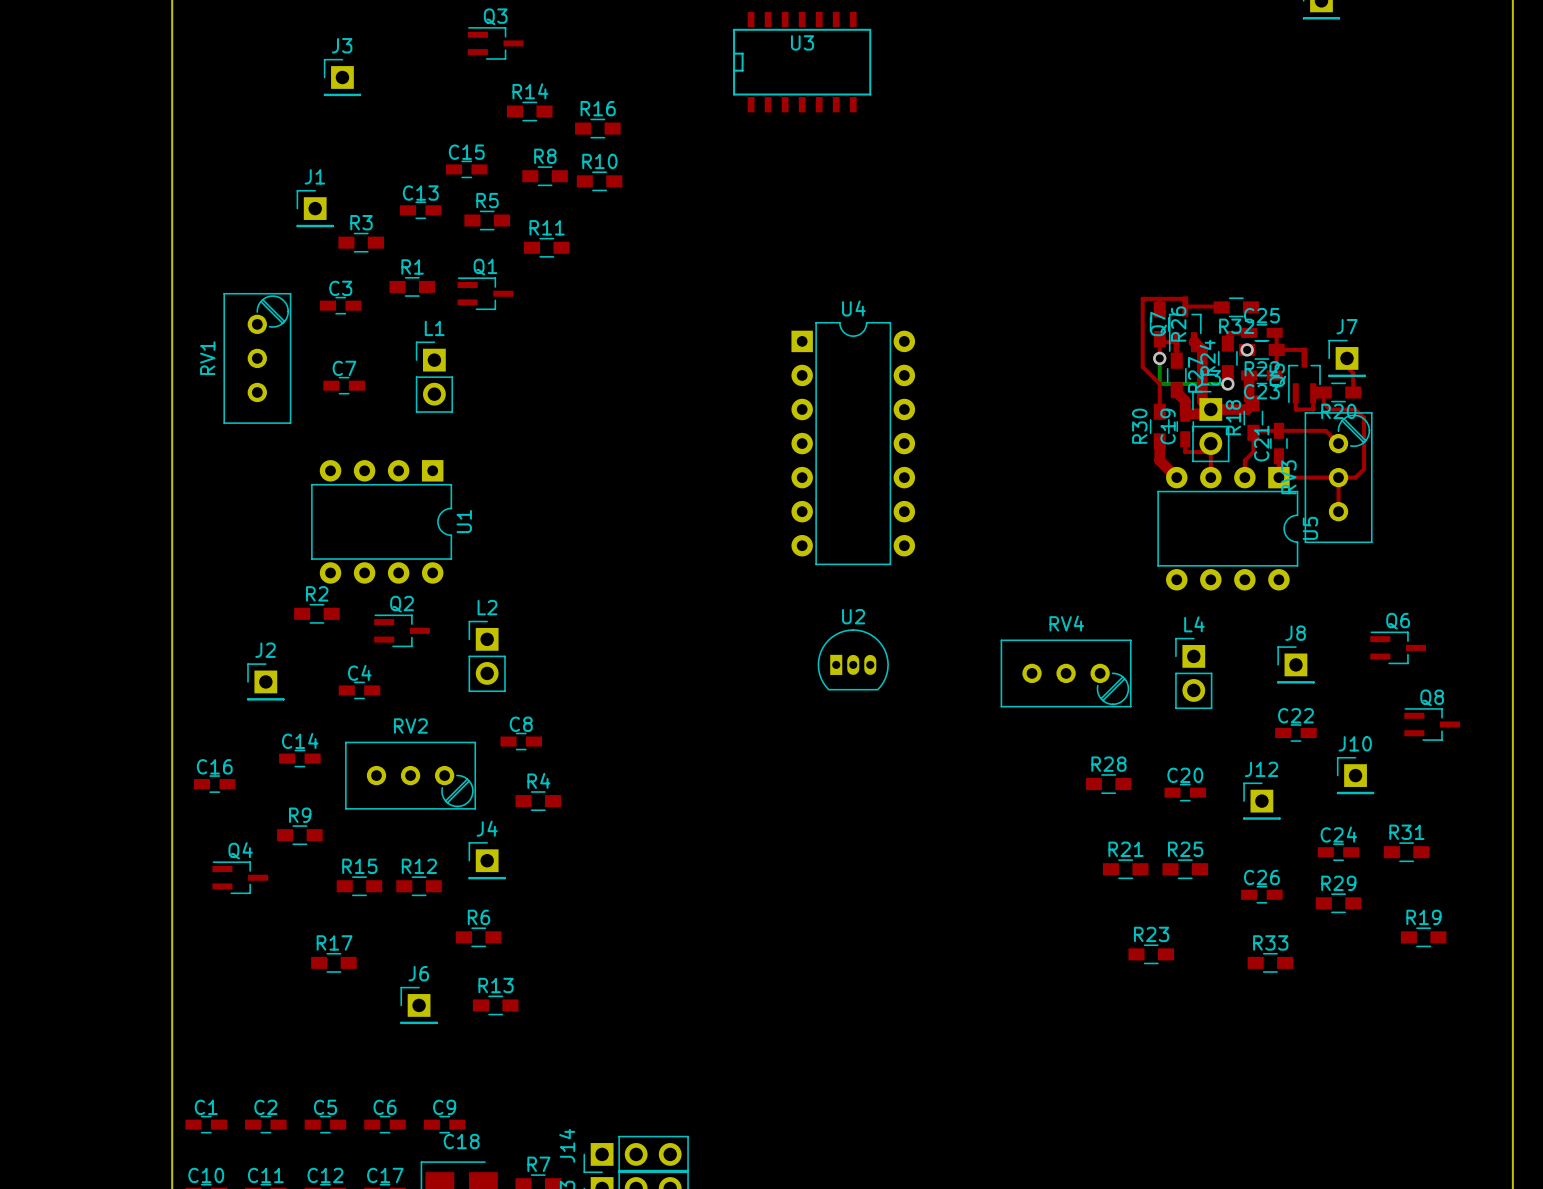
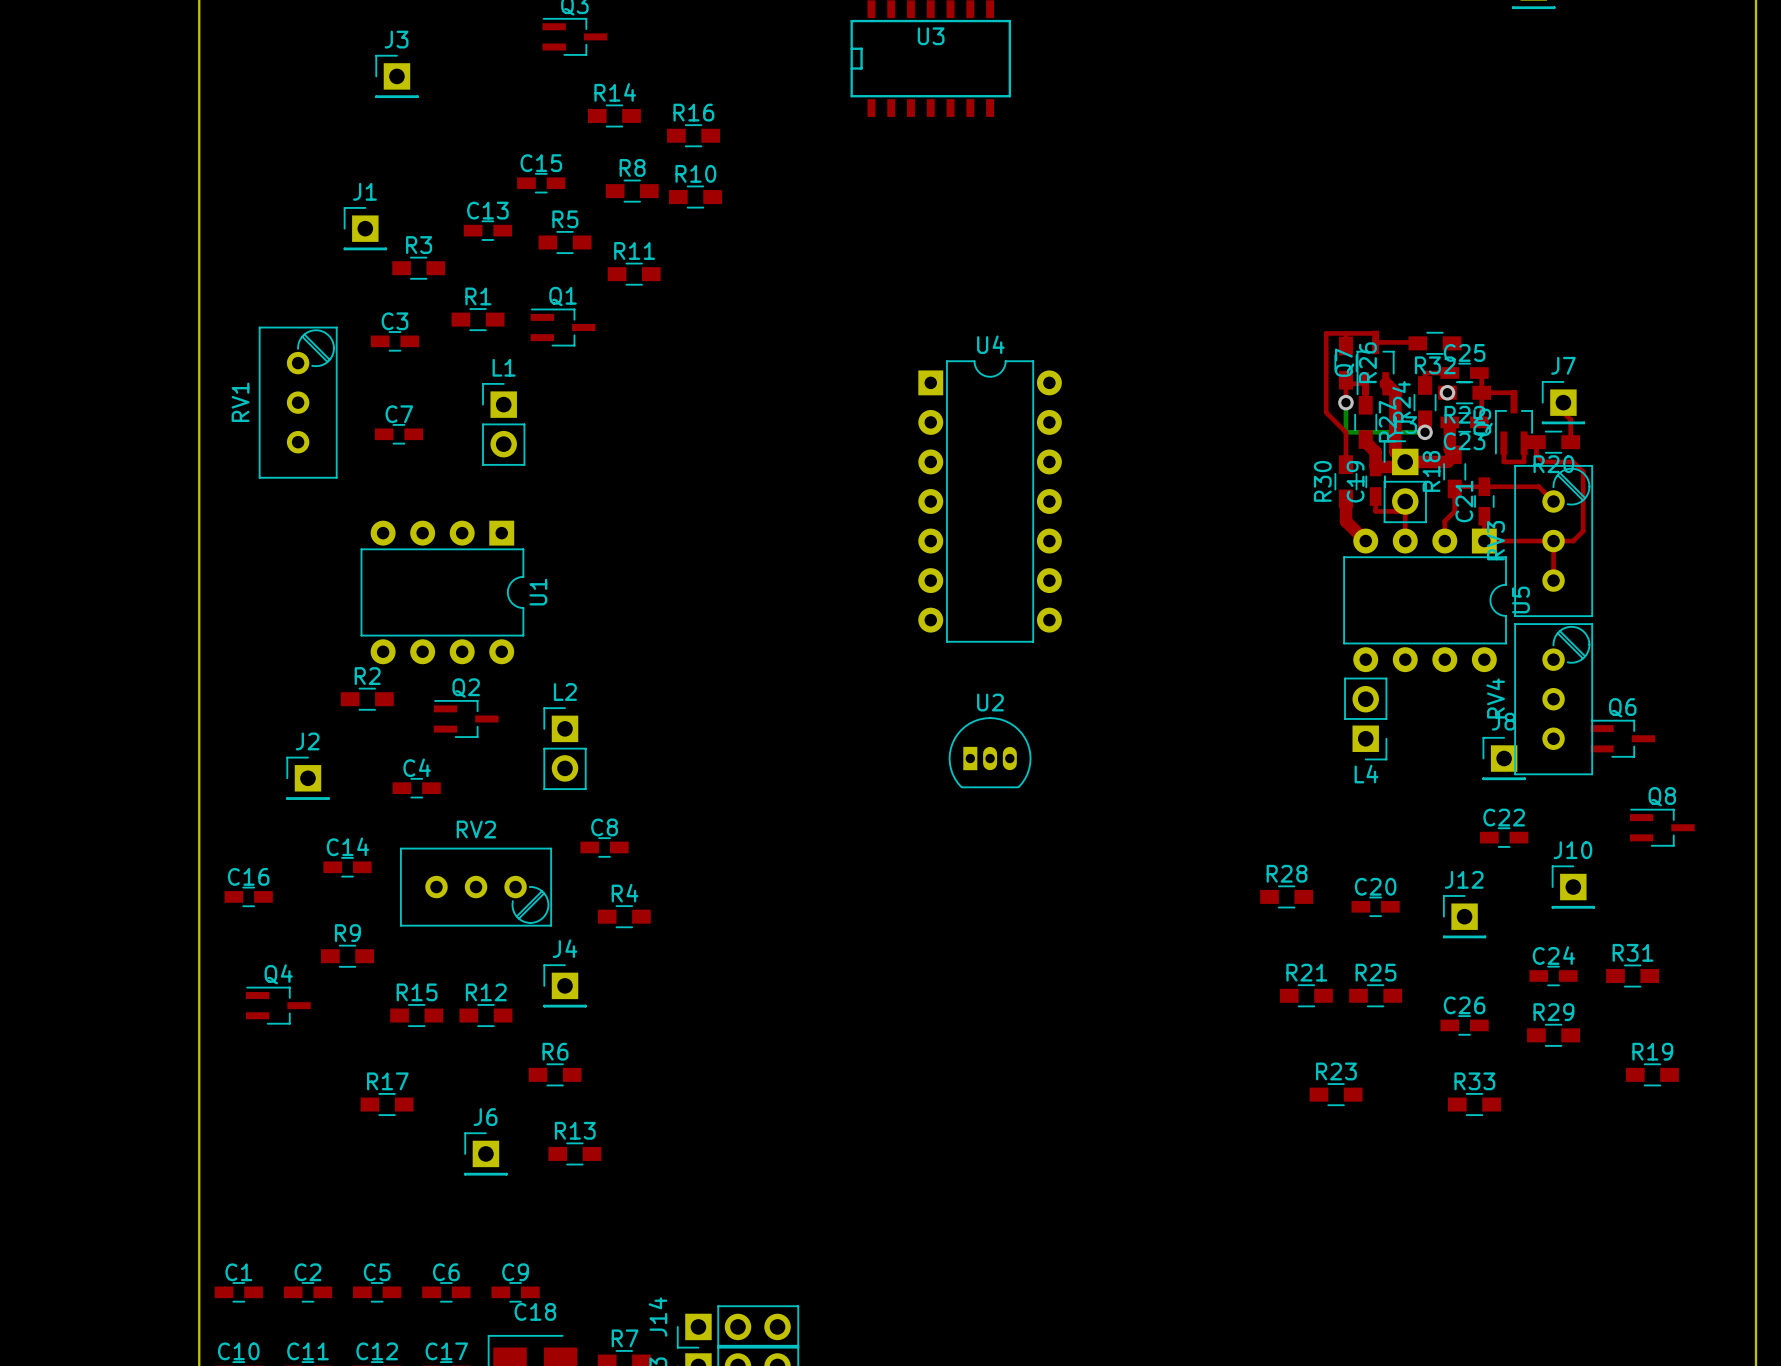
RV4 rotation: 0° (1066, 673) -> 90° counterclockwise (1553, 699)
RV4 position: (1066, 673) -> (1553, 699)
L4 rotation: 0° (1193, 673) -> 180° (1365, 718)
L4 position: (1193, 673) -> (1365, 718)

